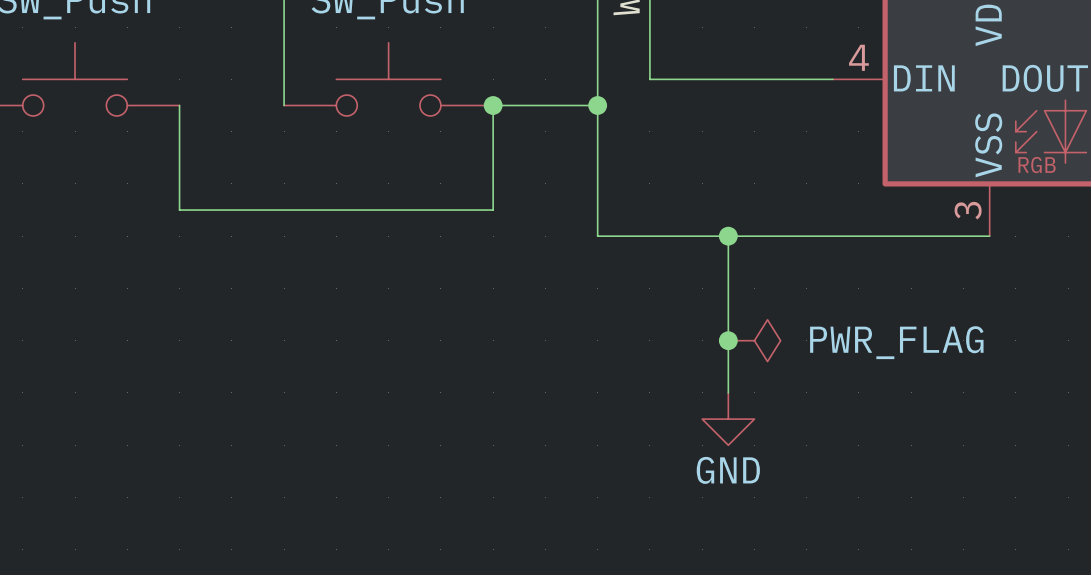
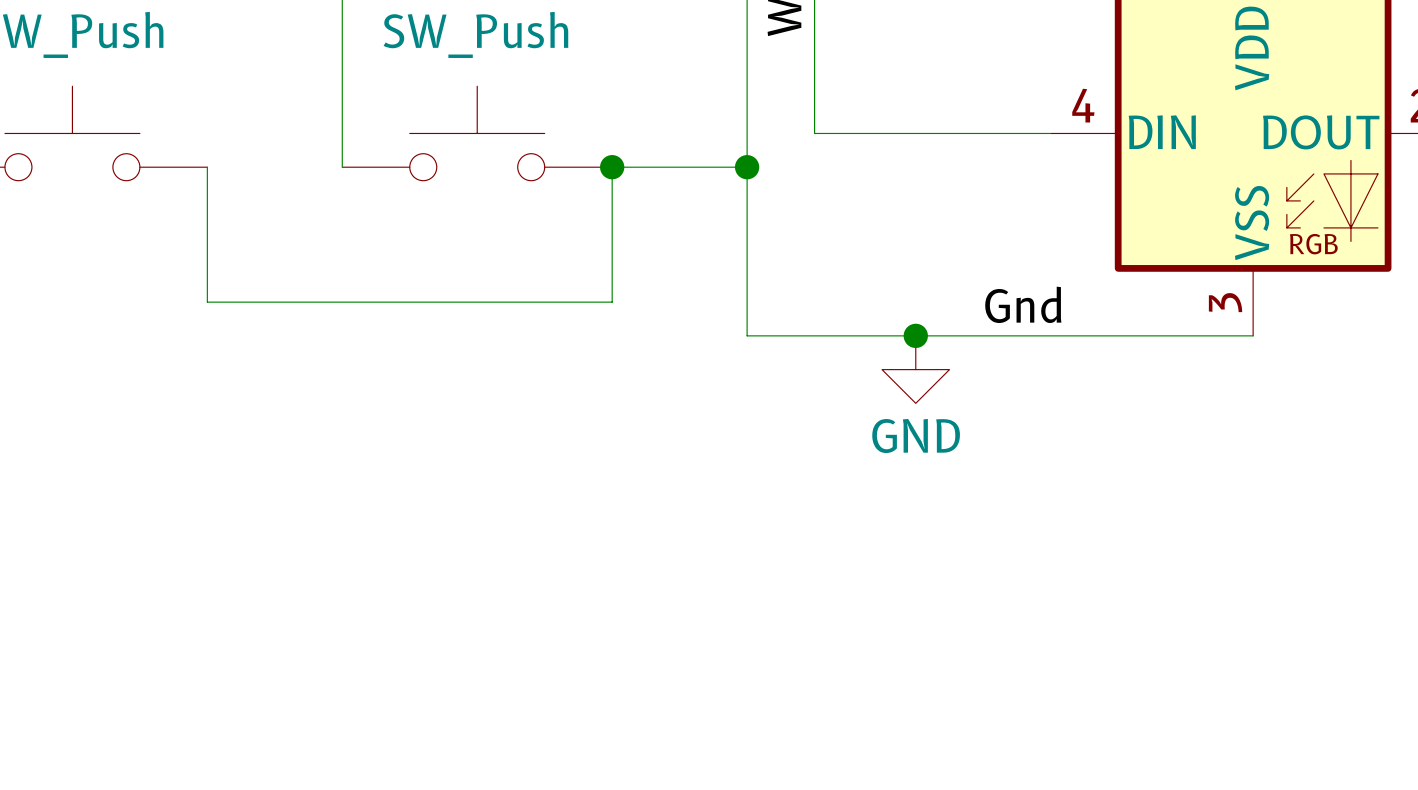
label: none -> Gnd (1023, 304)
wire: (728, 236) (728, 392) -> none
junction: (728, 340) -> none
power symbol: PWR_FLAG (754, 340) -> none
power symbol position: GND (728, 419) -> GND (915, 369)

